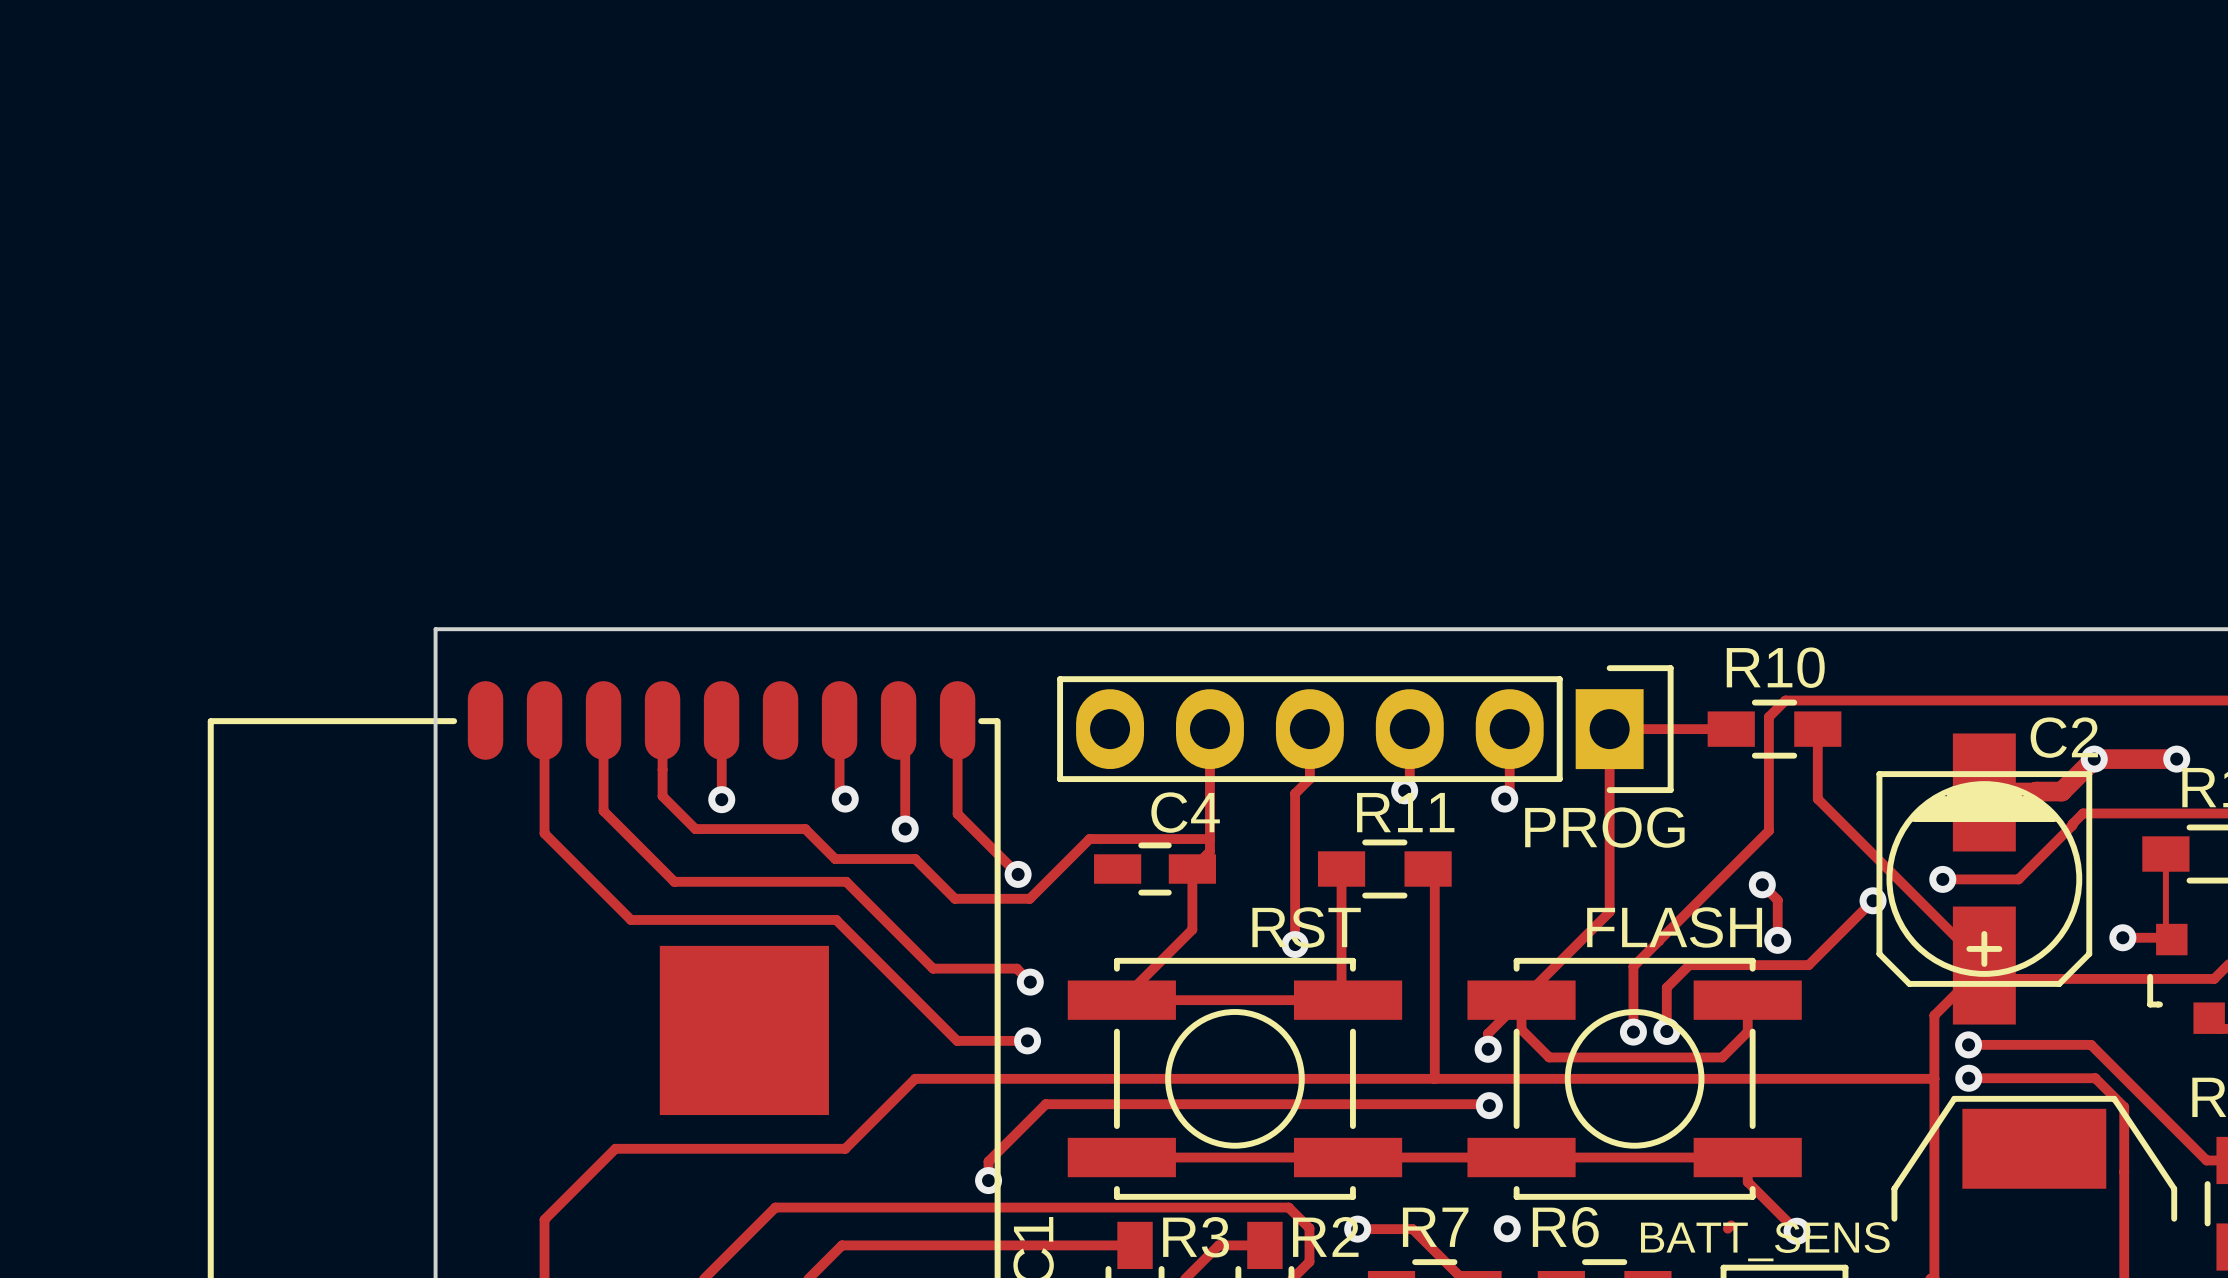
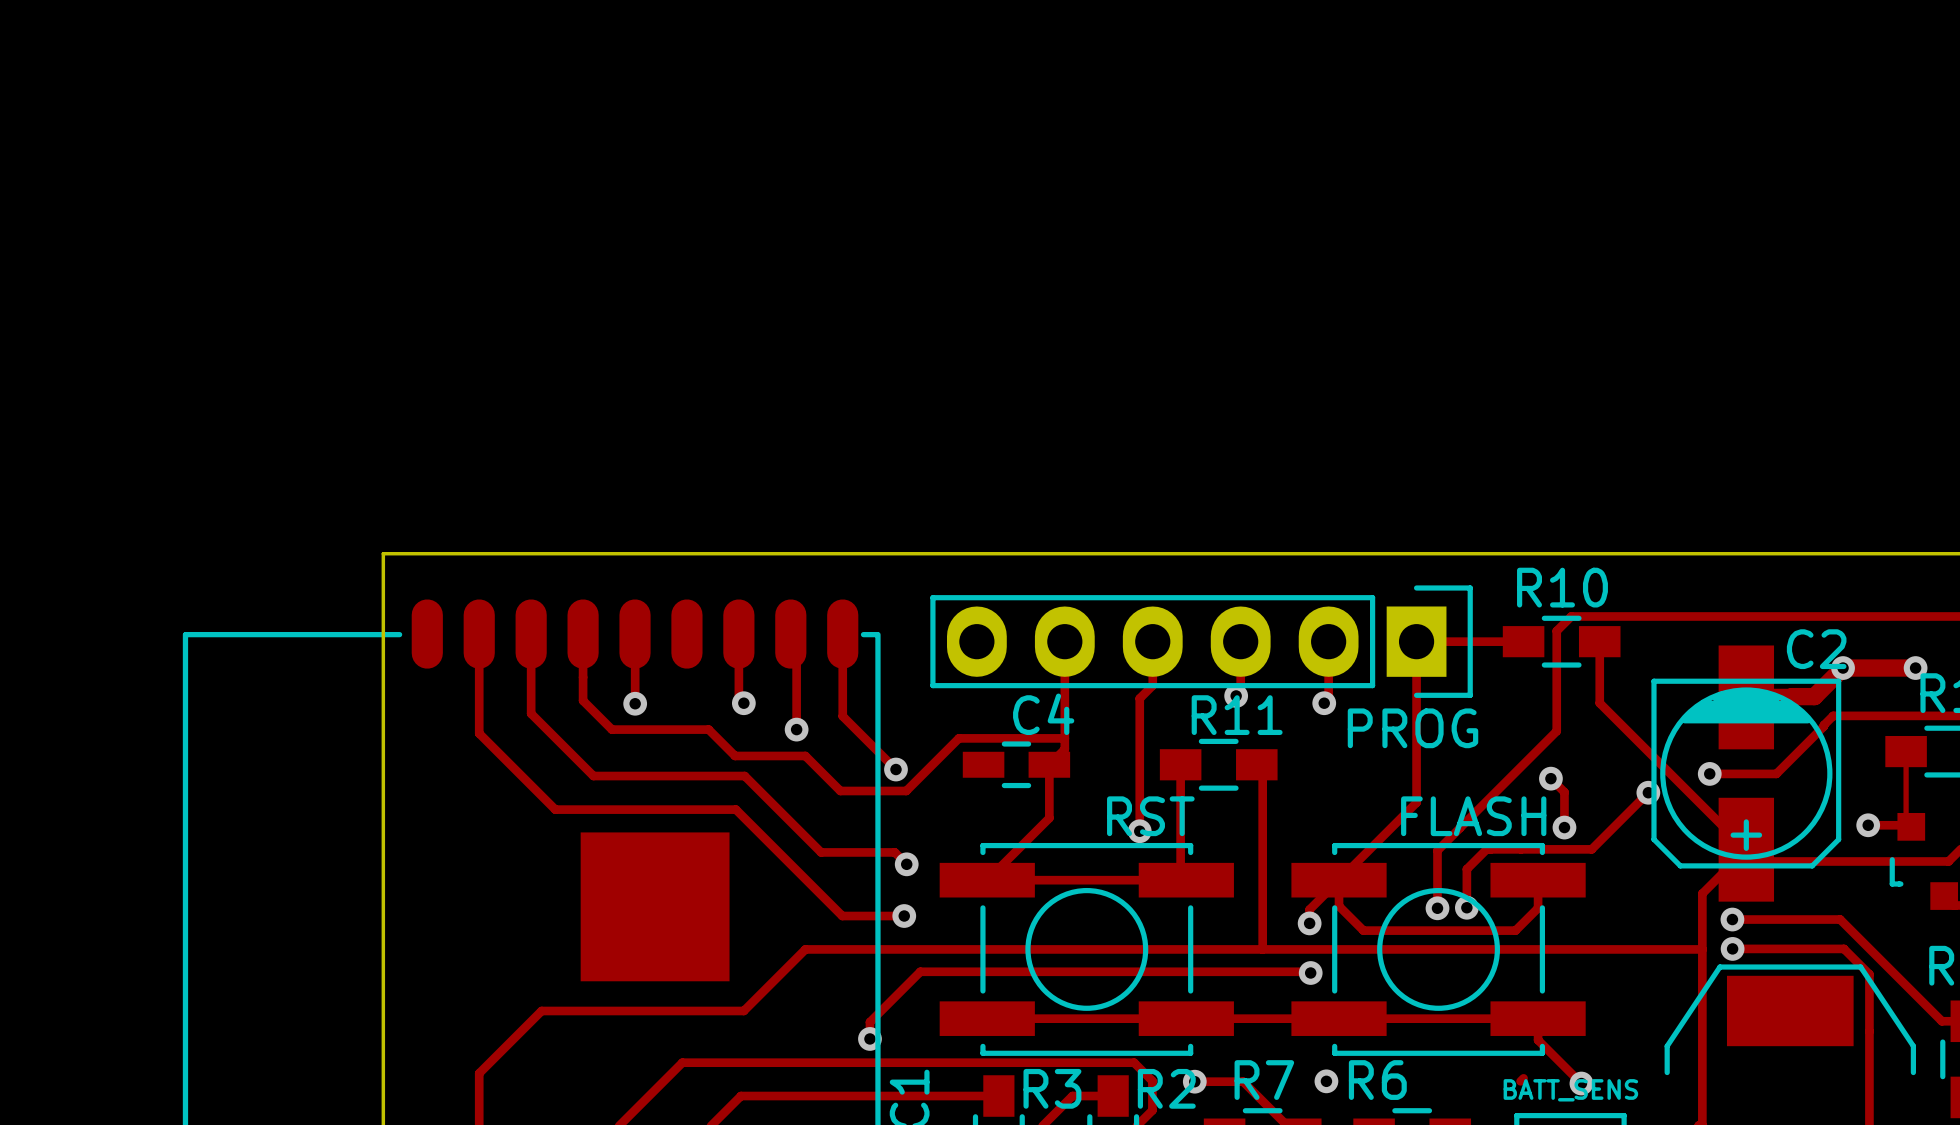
text: none -> BATT_SENS (1570, 1090)
BATT_SENS name: BATT_SENS (1765, 1241) -> none

